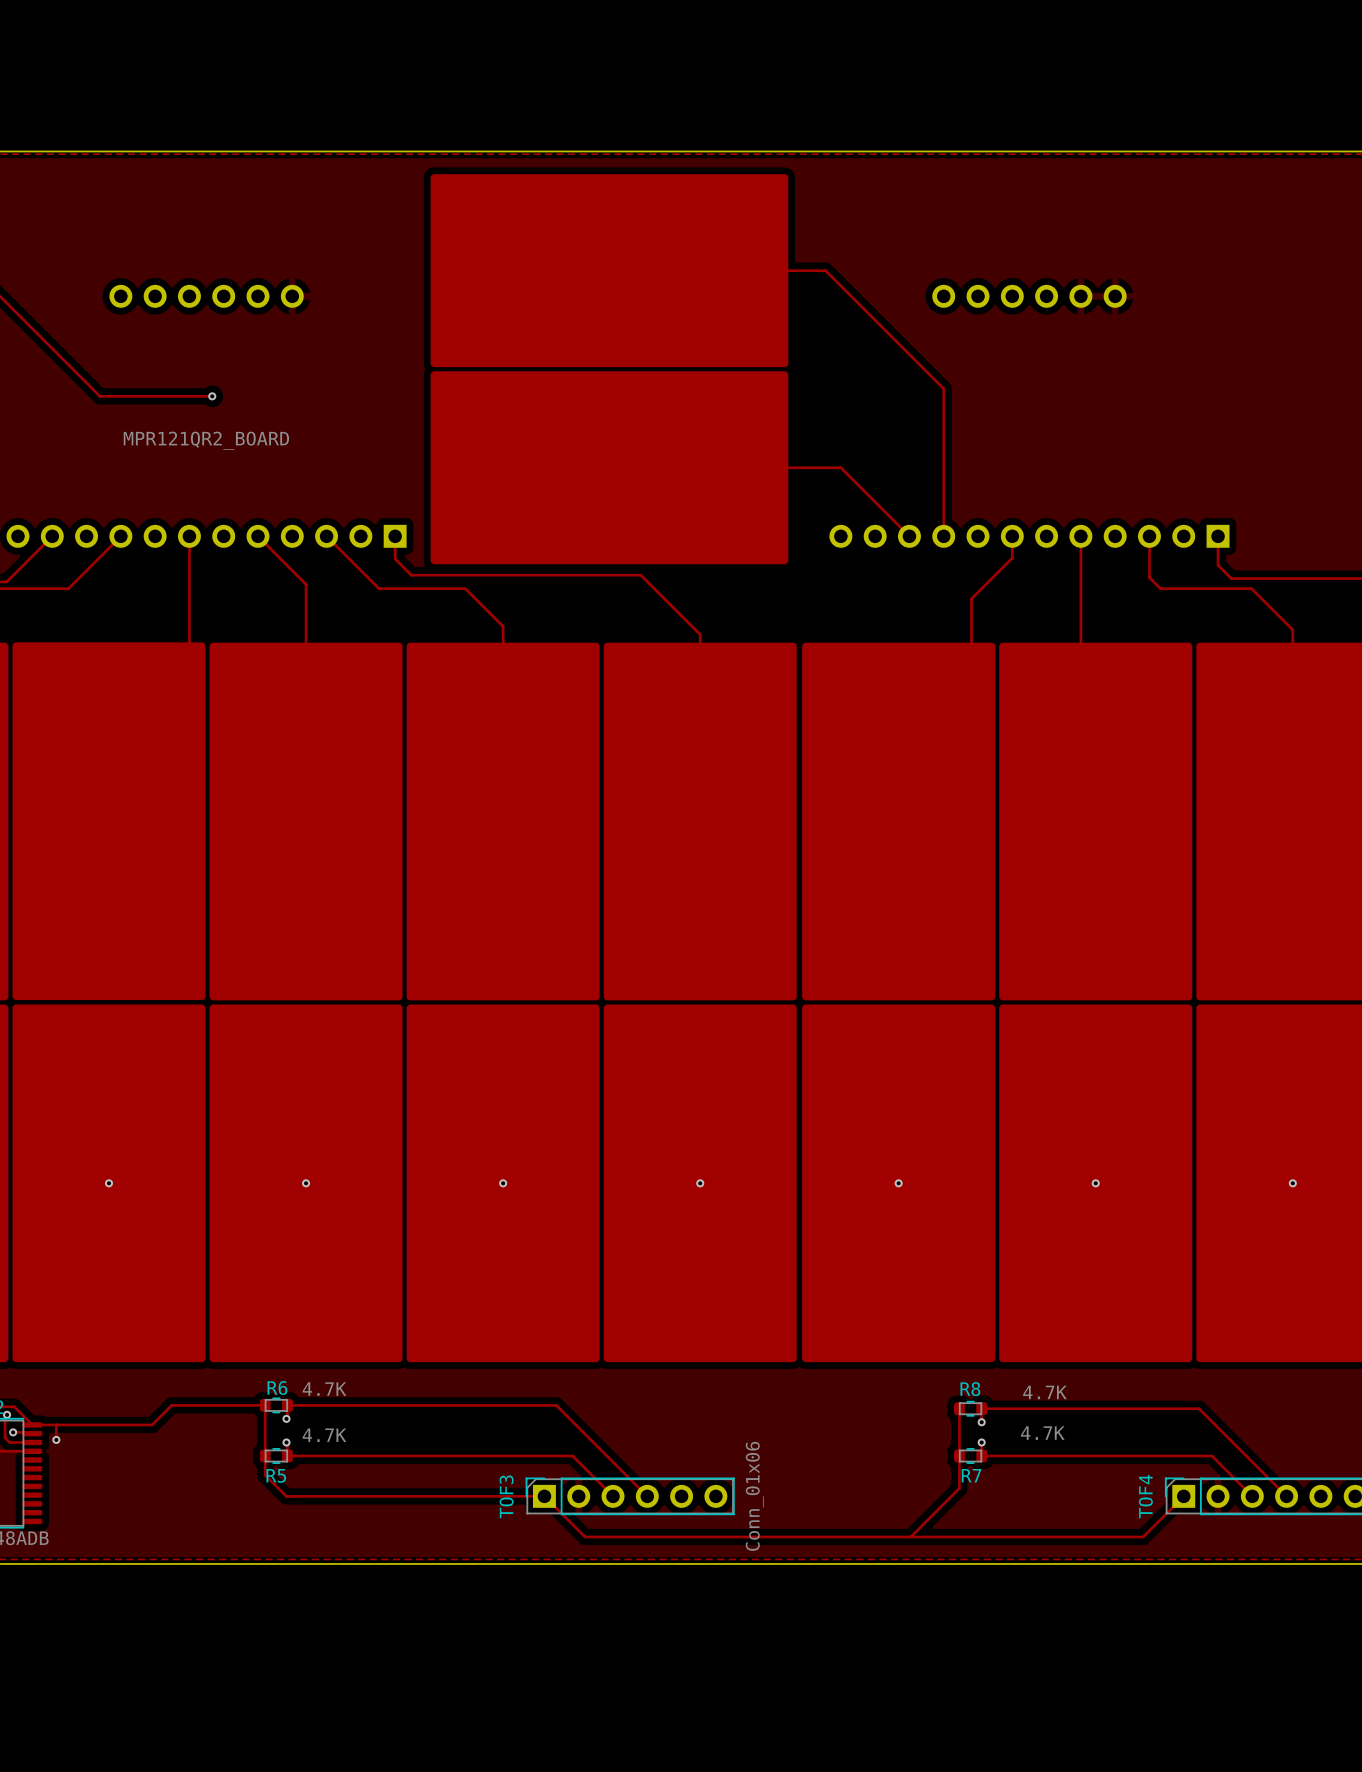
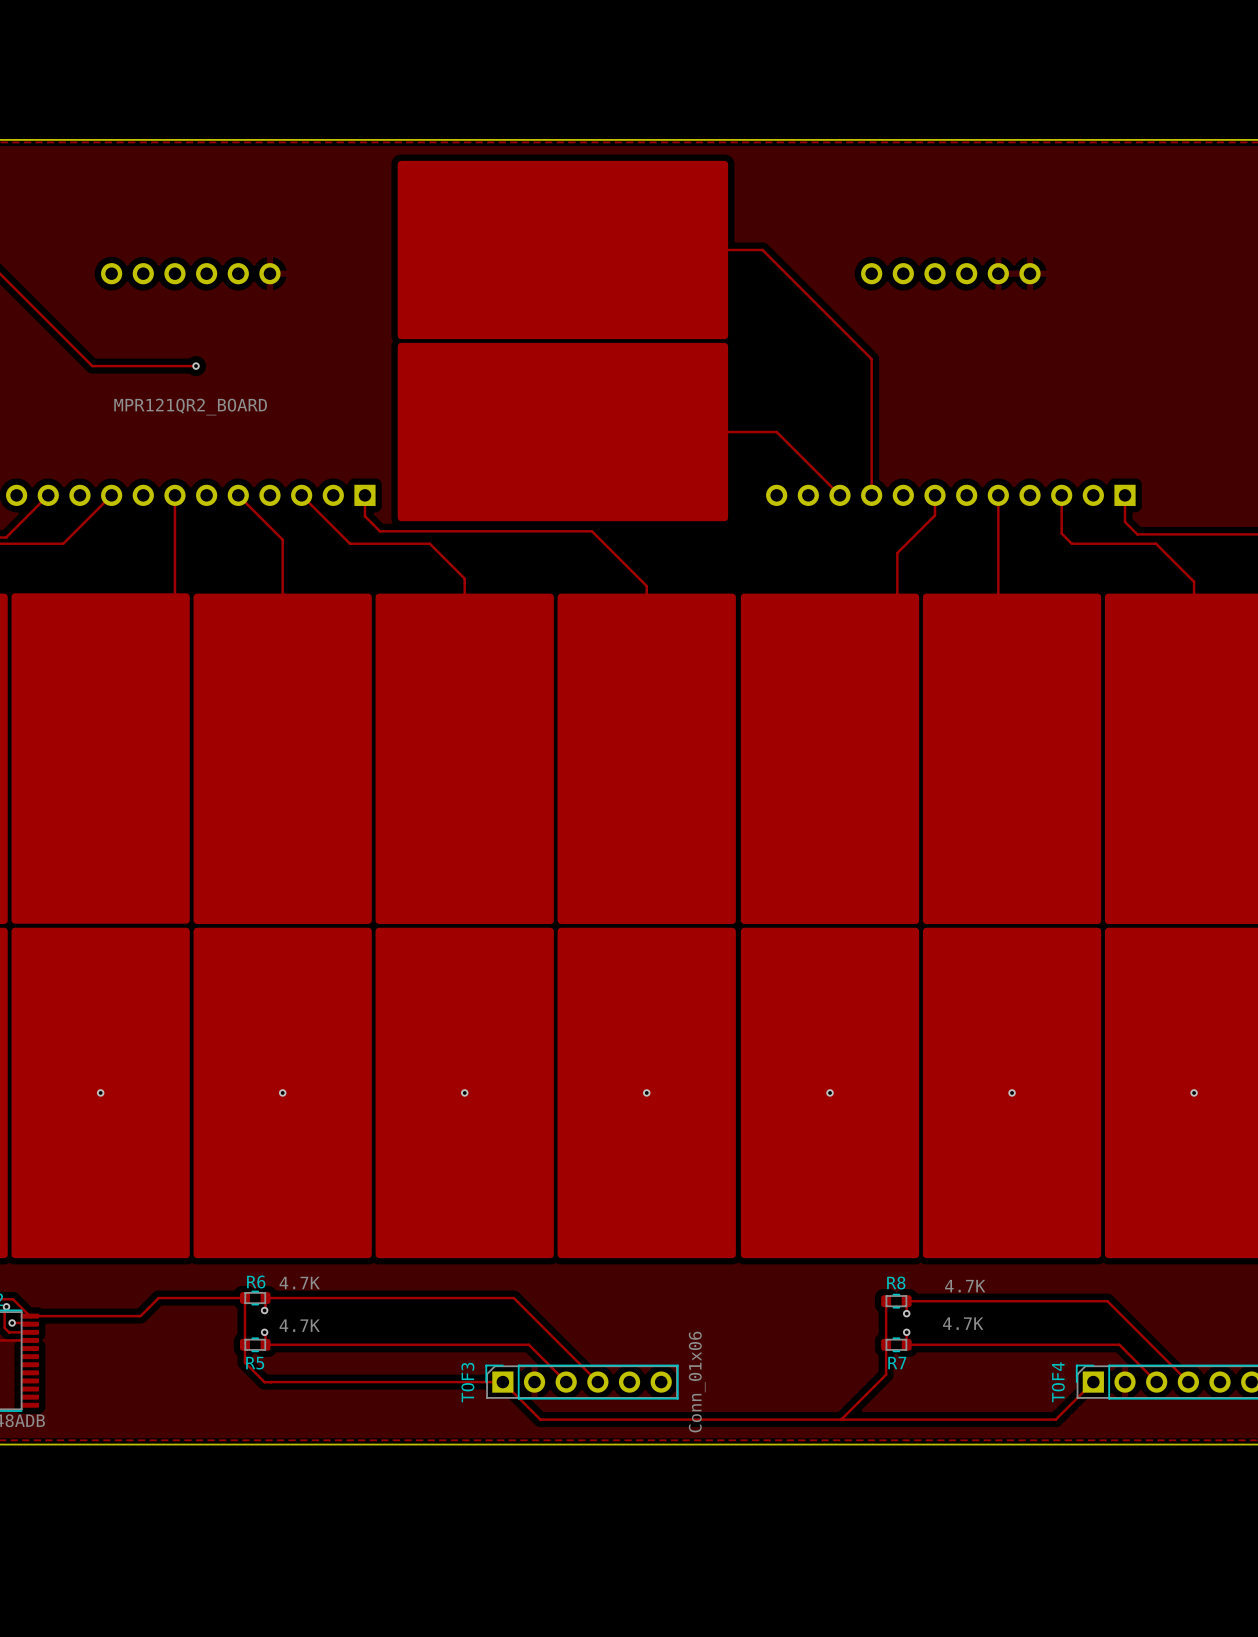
track: (56, 1424) (56, 1439) -> none
via: (56, 1439) -> none

